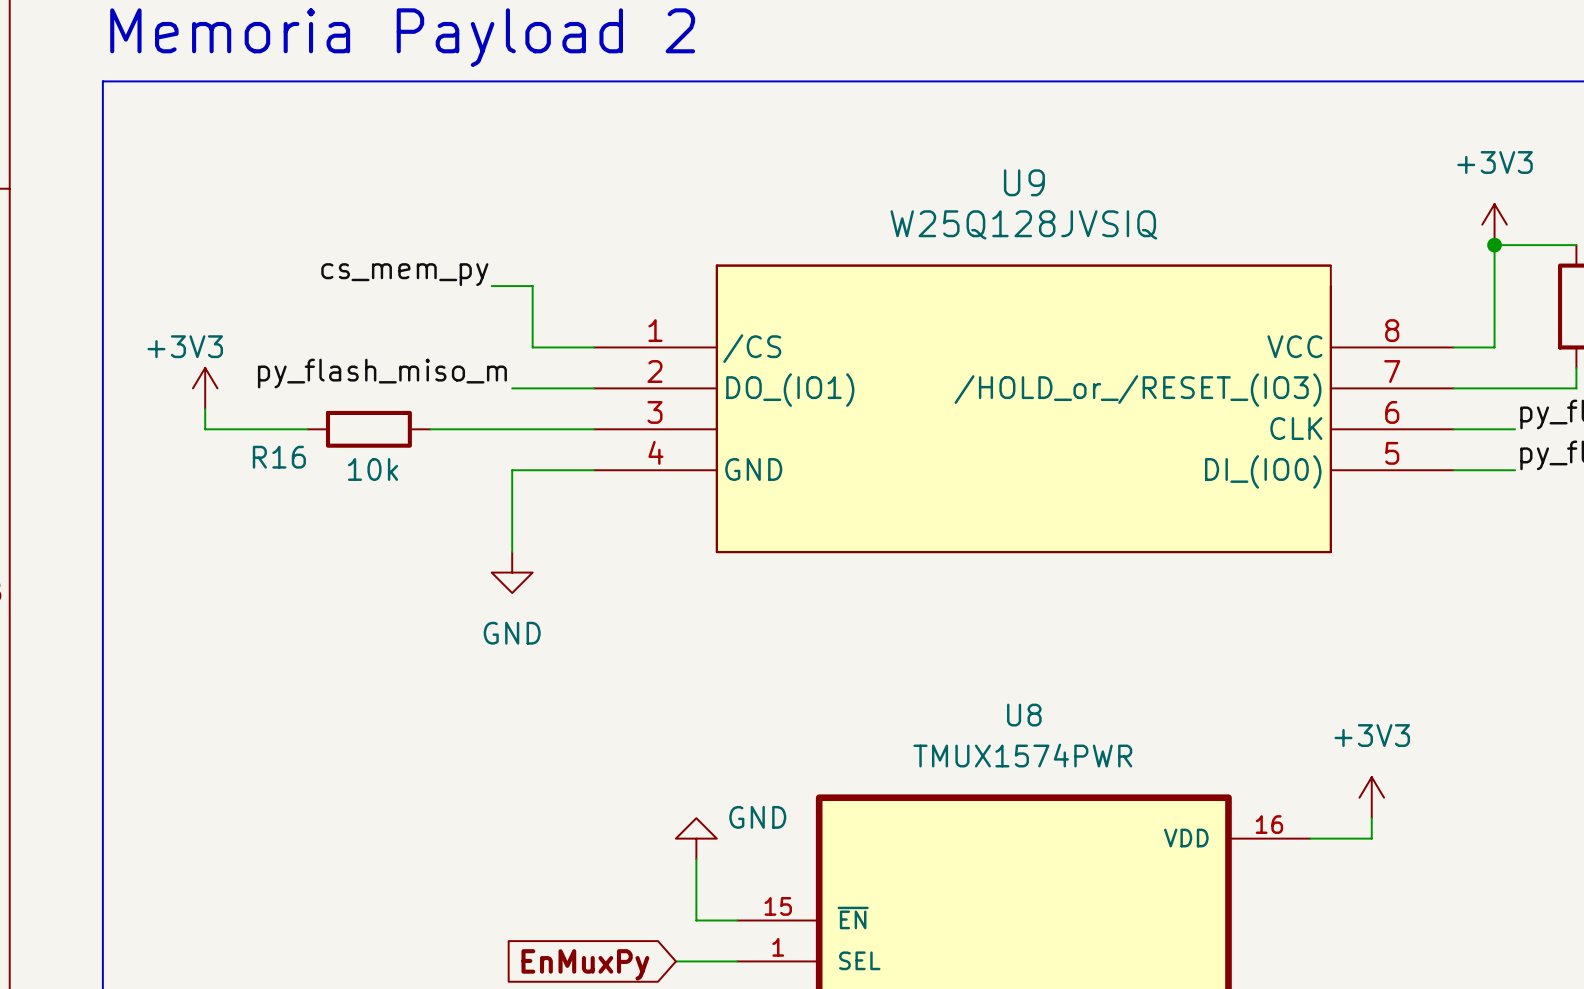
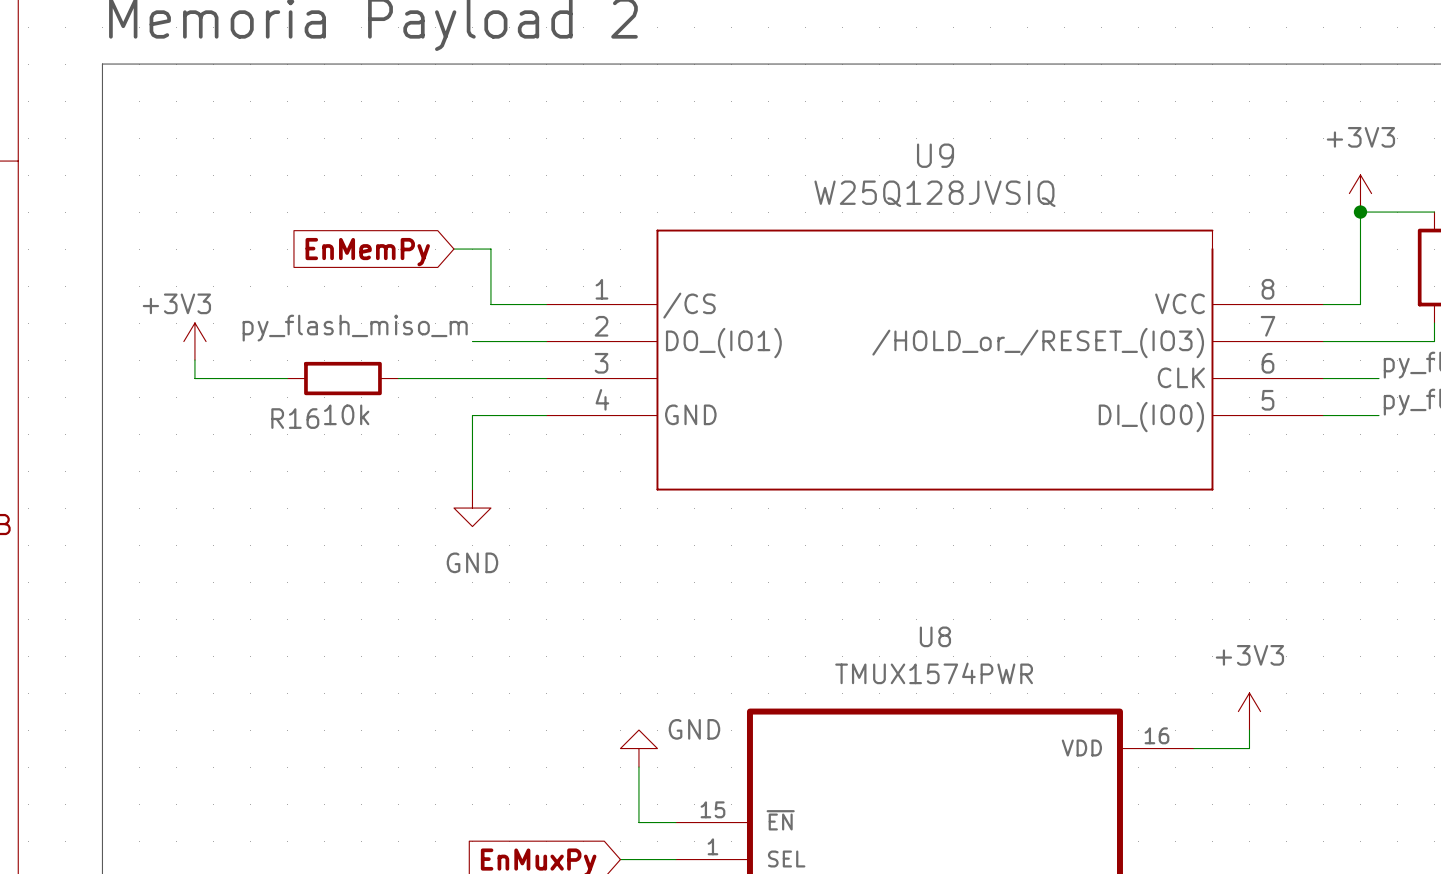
label: cs_mem_py (404, 274) -> none
global label: none -> EnMemPy (367, 252)
R16 name position: R16 (279, 457) -> R16 (295, 418)

